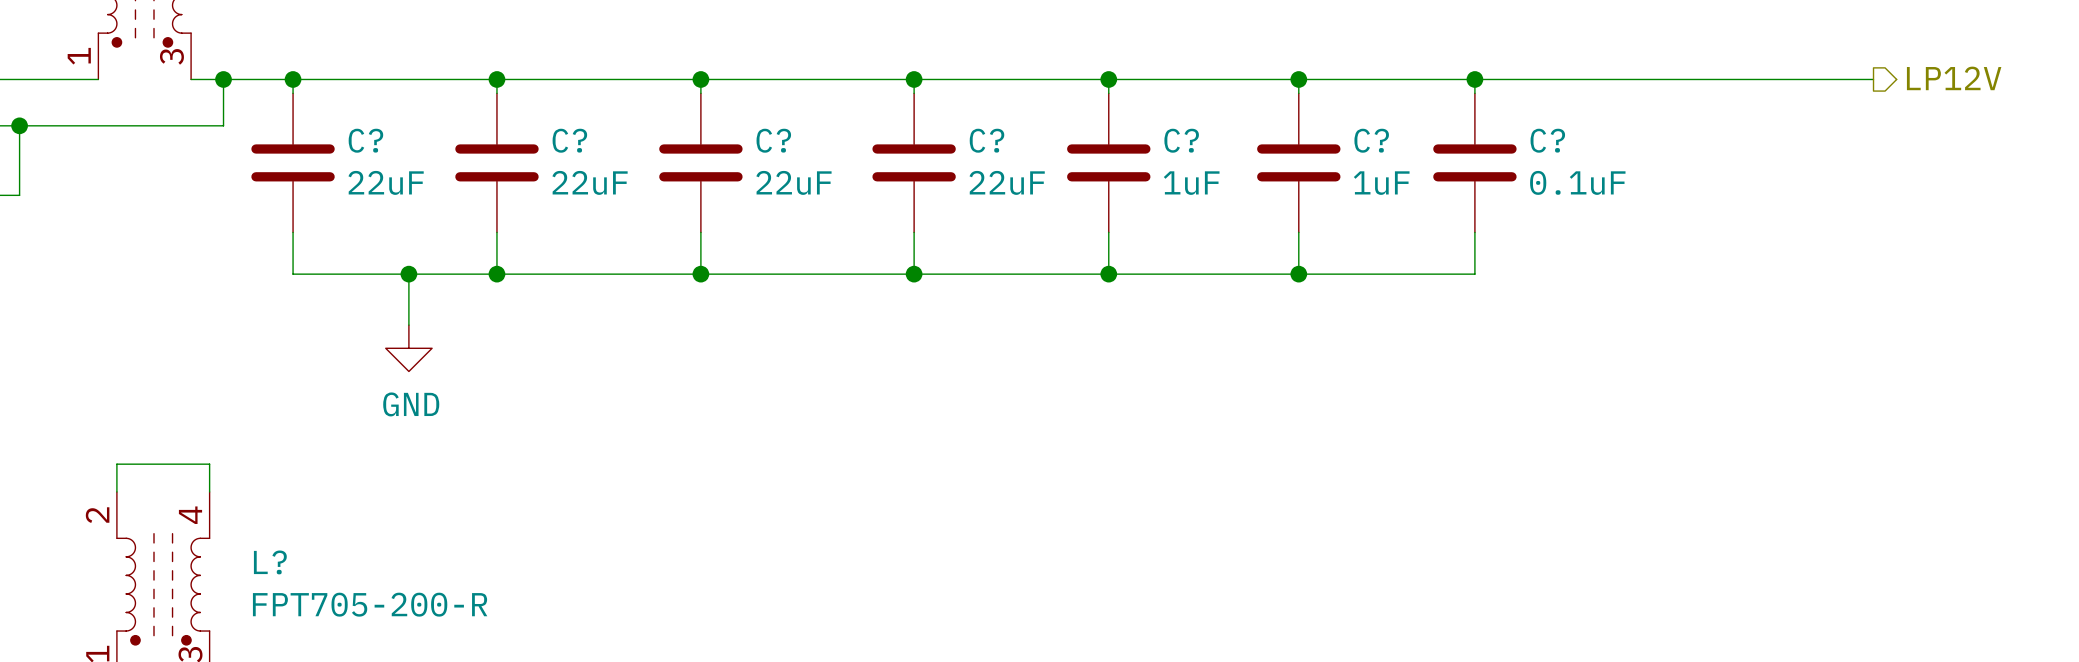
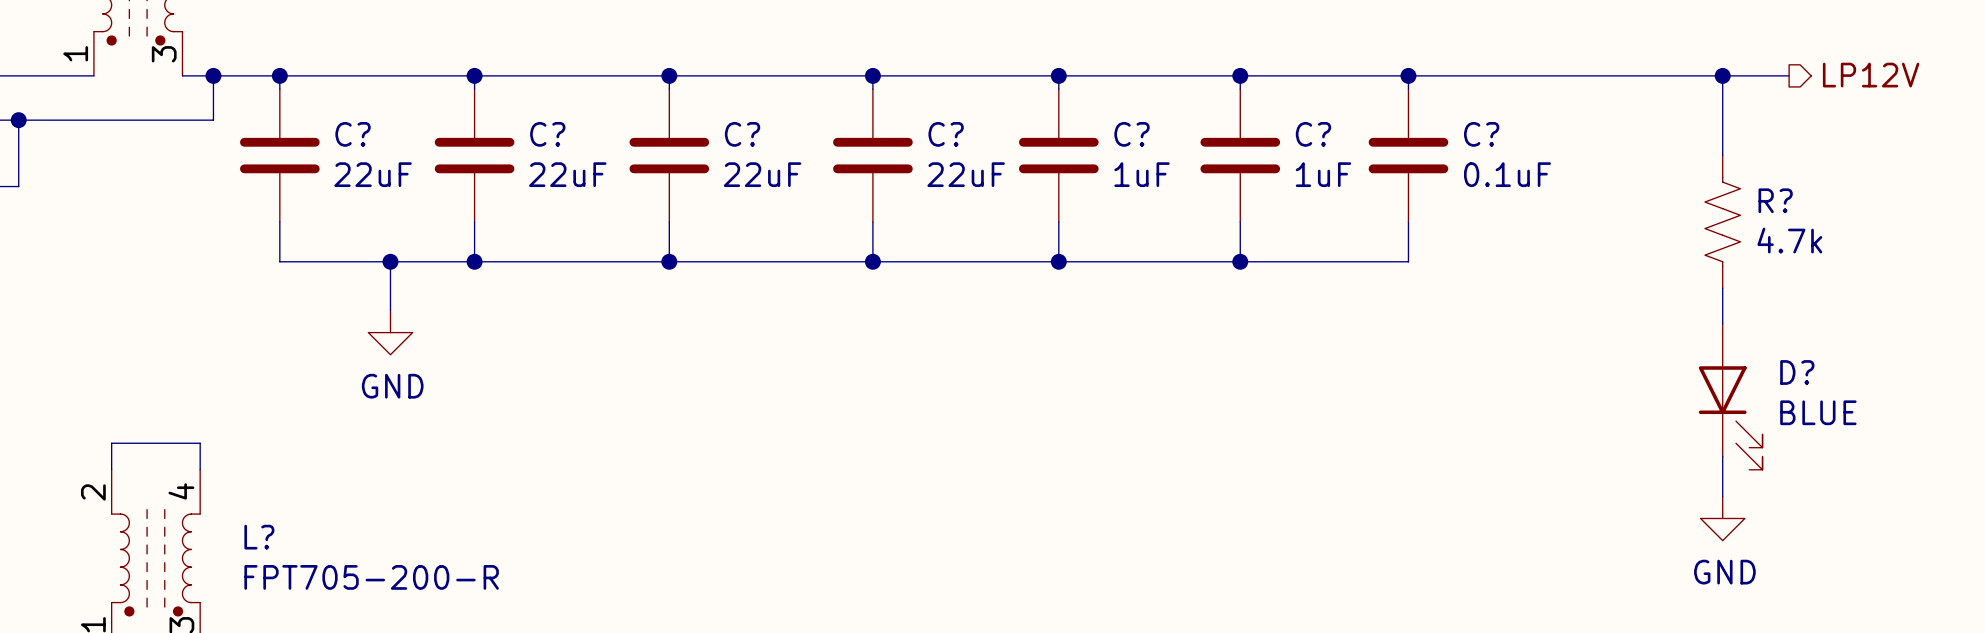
wire: none -> (1722, 75) (1722, 155)
junction: none -> (1722, 75)
R?: none -> 4.7k (1722, 221)
wire: none -> (1722, 288) (1722, 323)
D?: none -> BLUE (1730, 396)
wire: none -> (1722, 456) (1722, 496)
power symbol: none -> GND (1722, 518)

